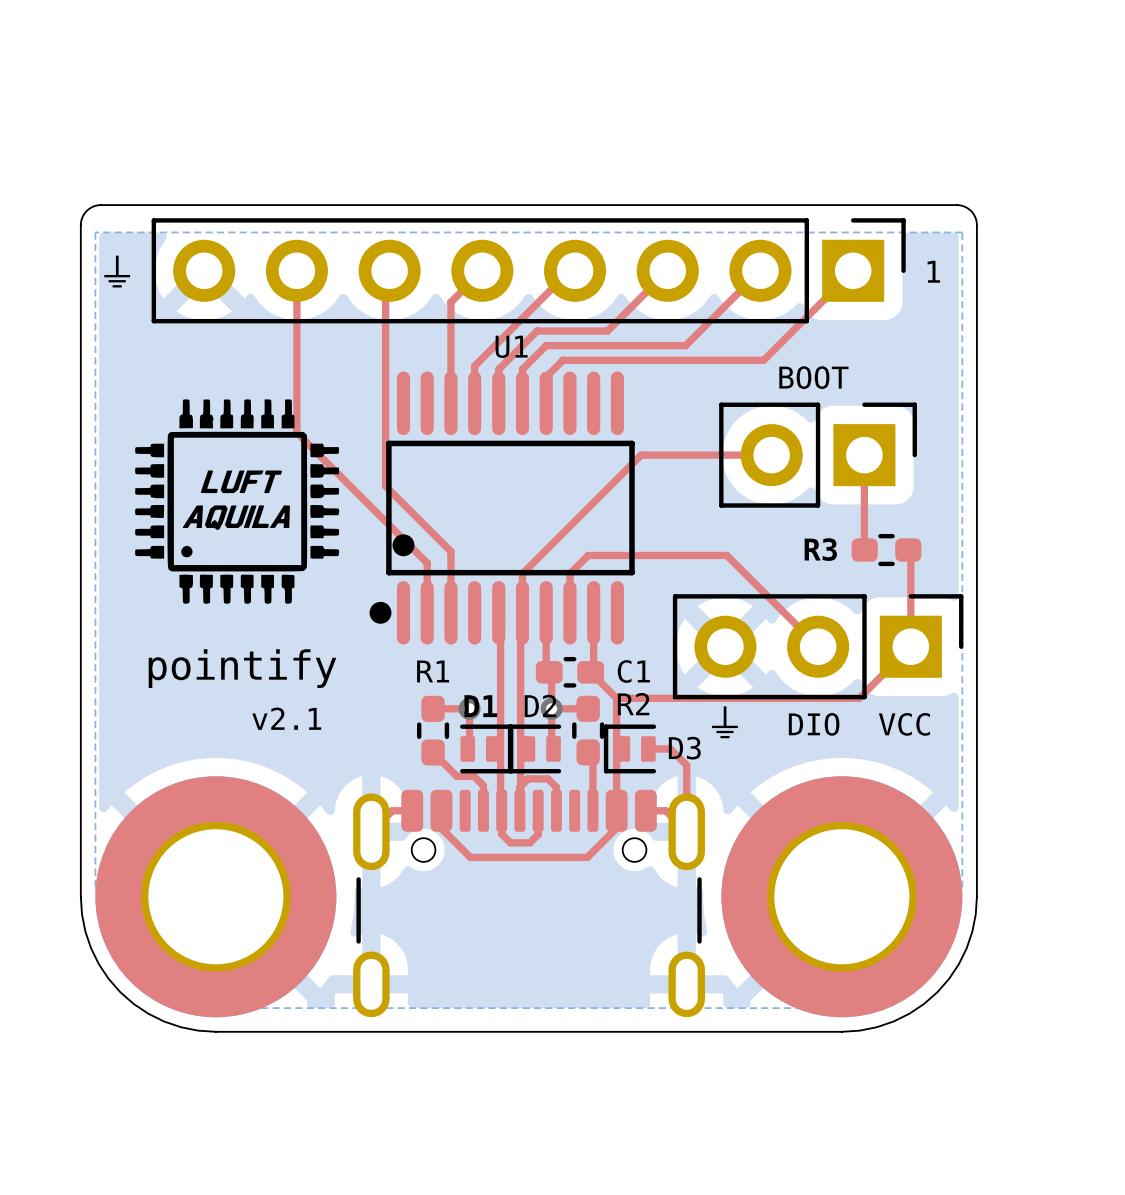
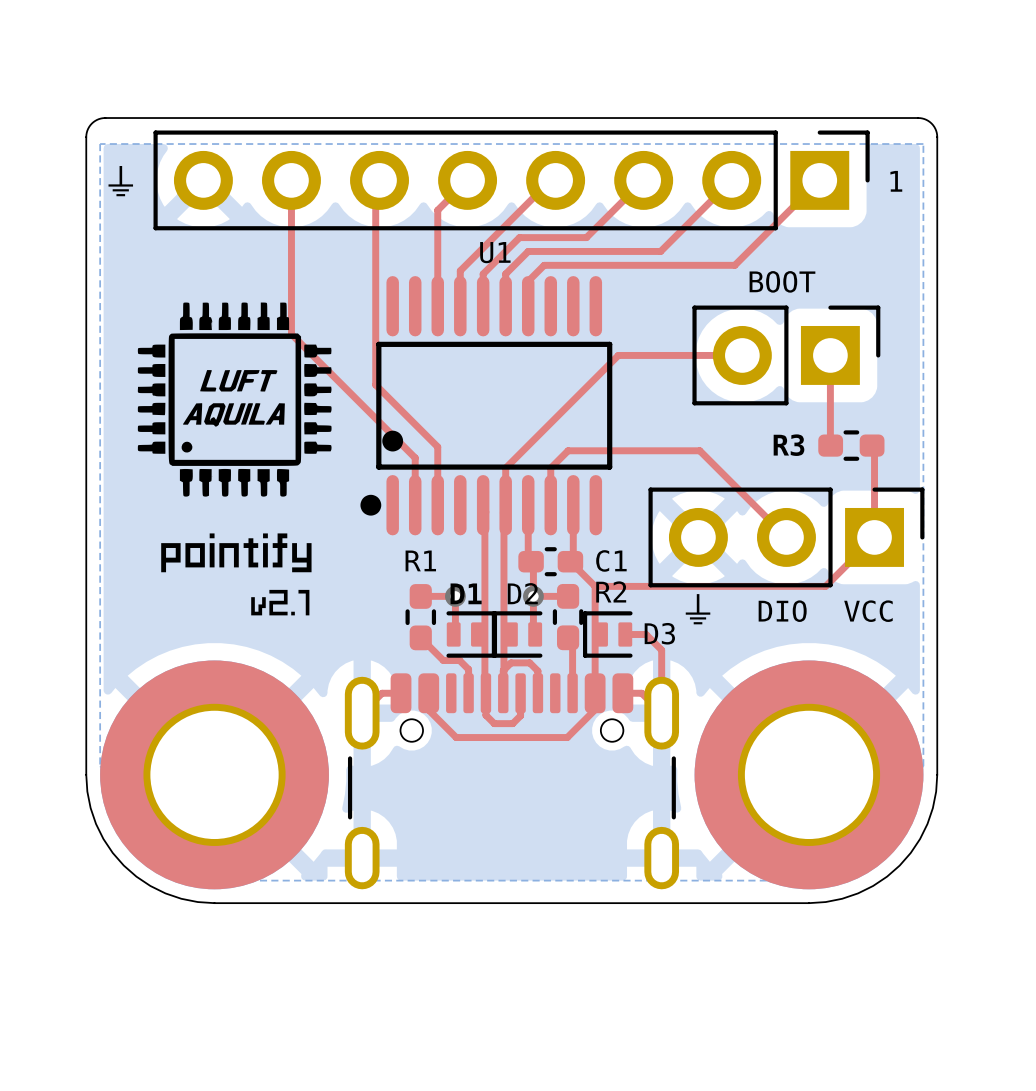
drawing: none -> [161, 533, 312, 616]
text: pointify (242, 668) -> none
text: v2.1 (286, 718) -> none

